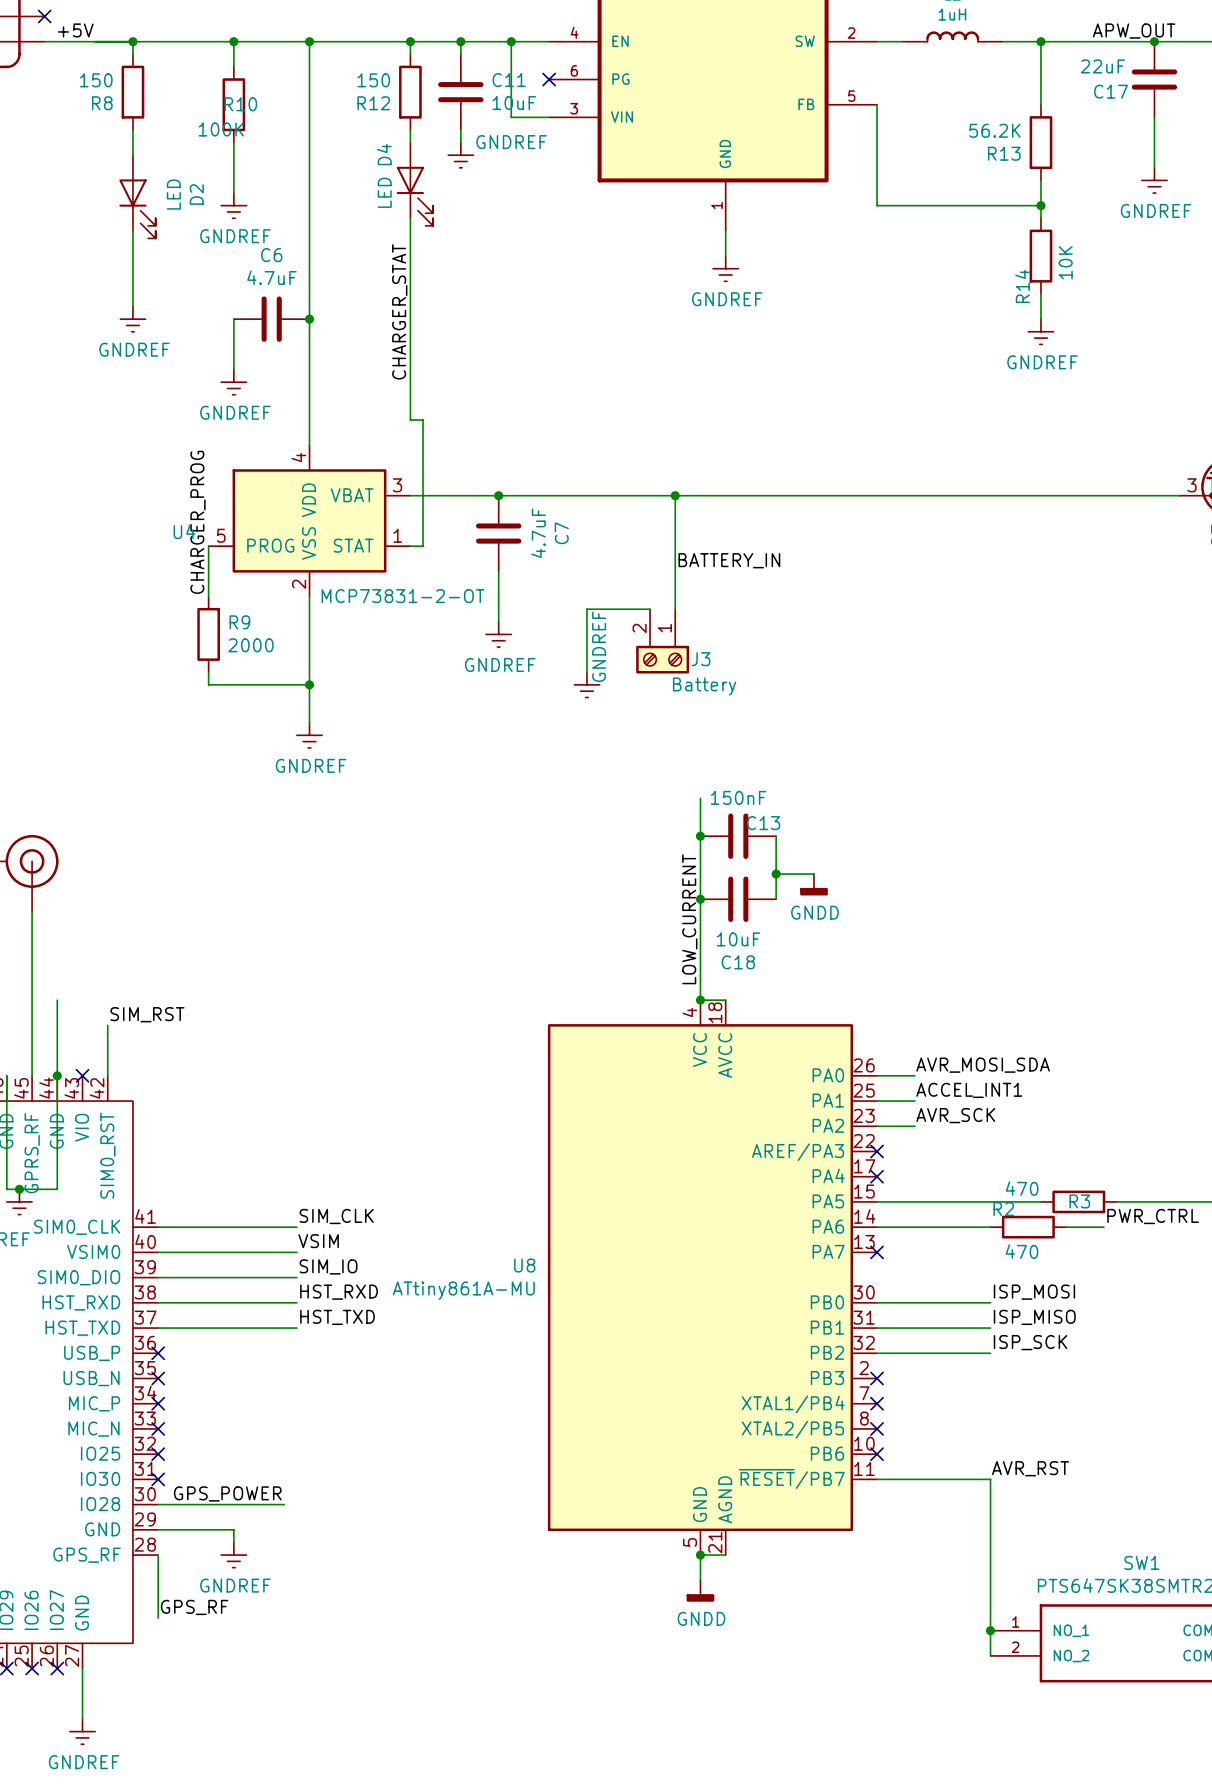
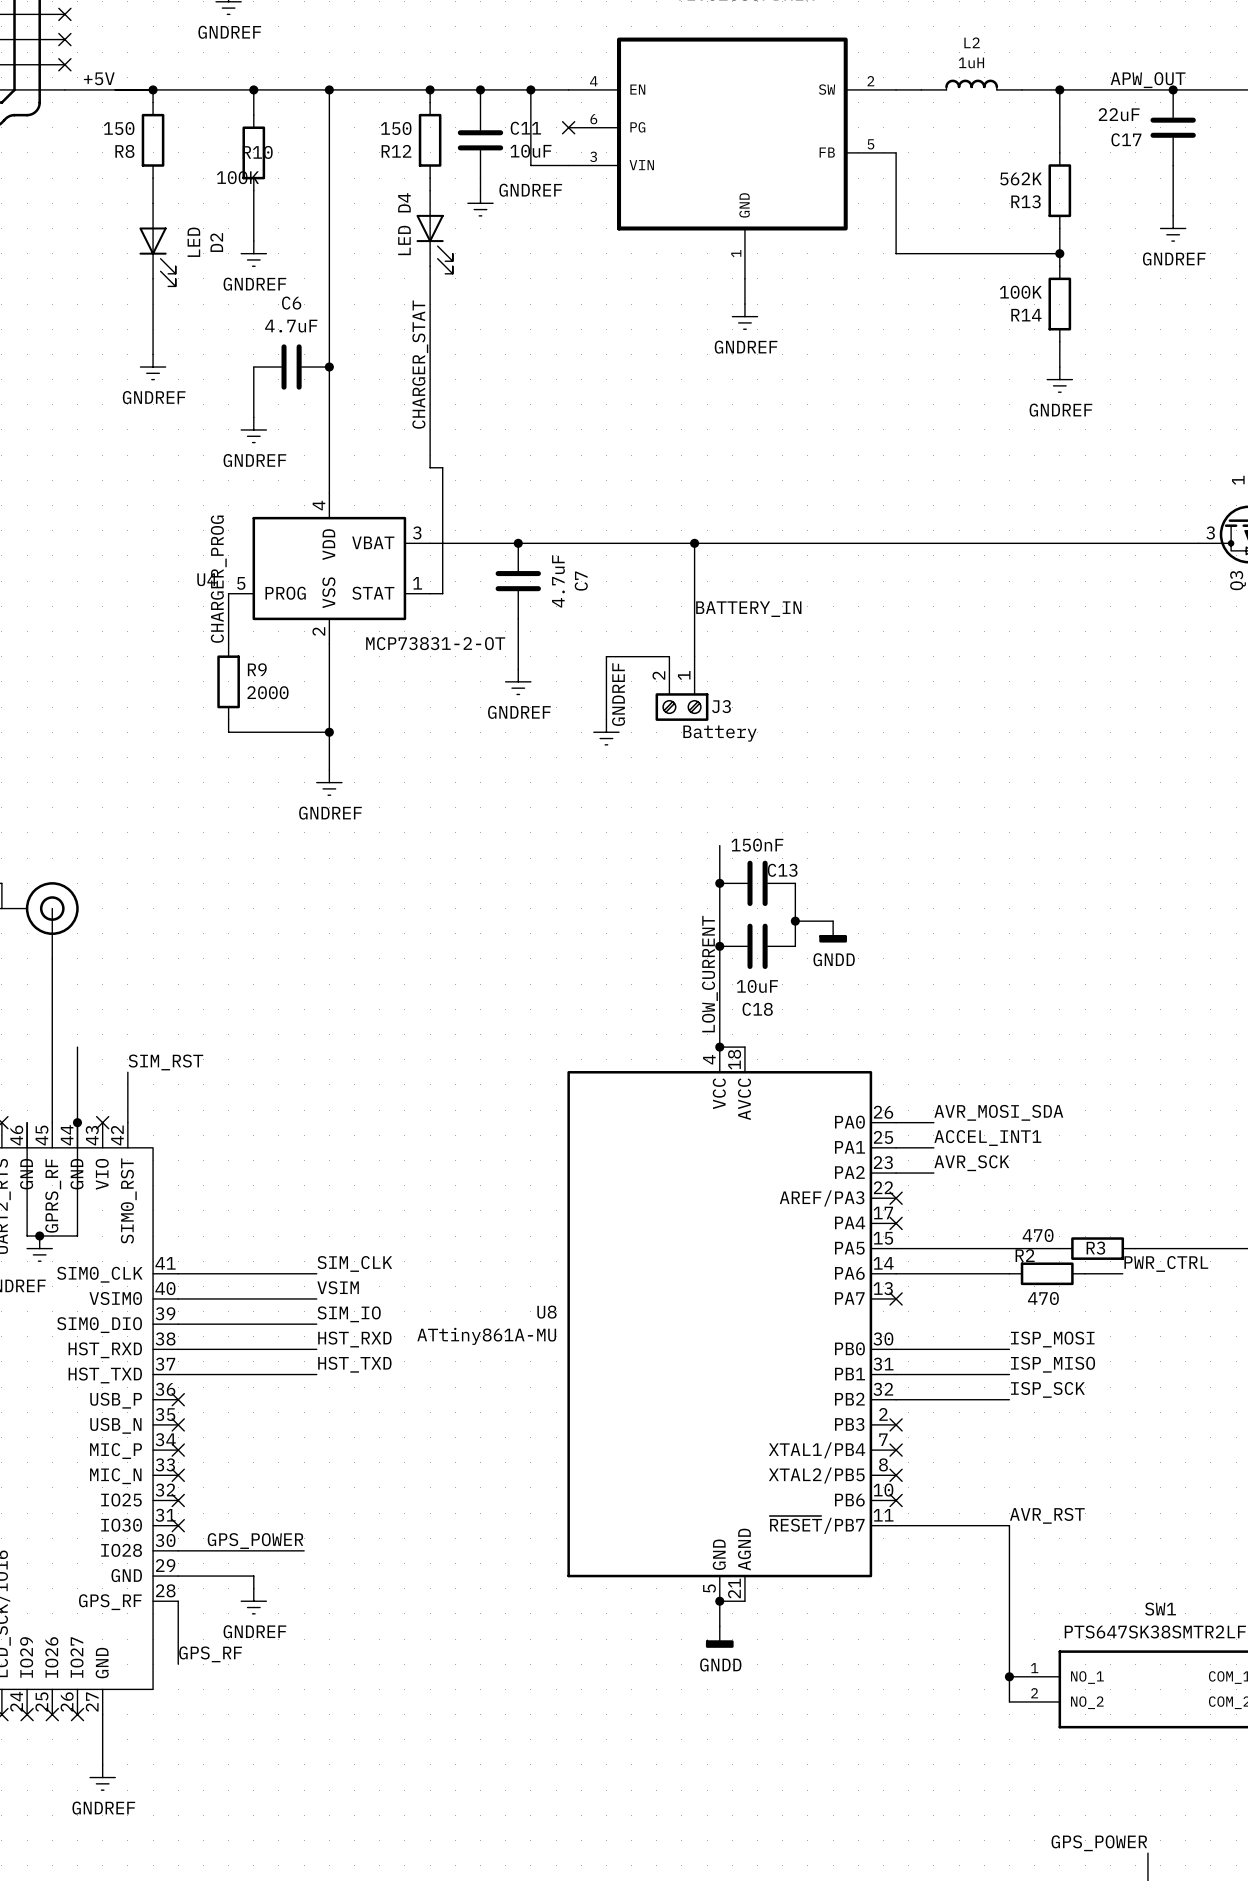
R13 value: 56.2K (994, 130) -> 562K (1020, 178)
R14 value: 10K (1065, 262) -> 100K (1020, 292)
R14 name rotation: 0° (1022, 286) -> 90° clockwise (1026, 315)

